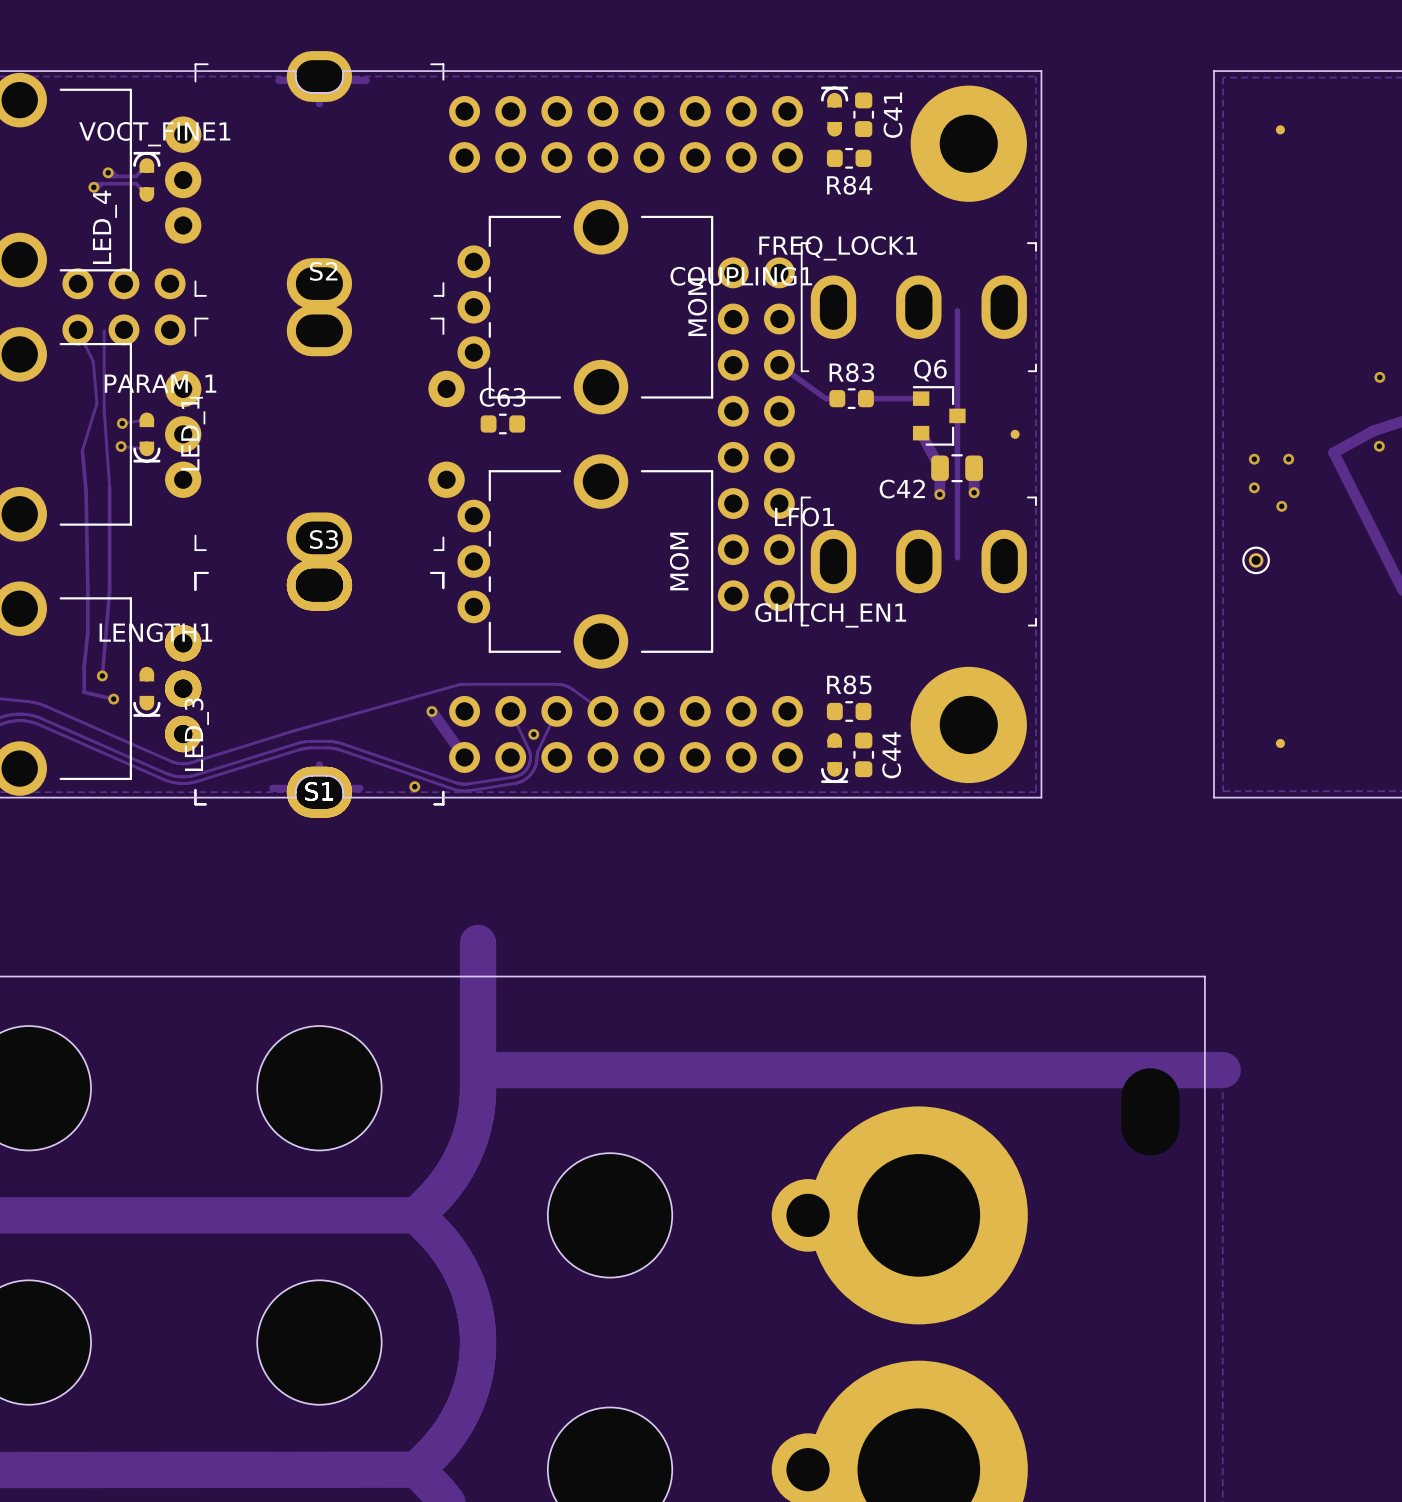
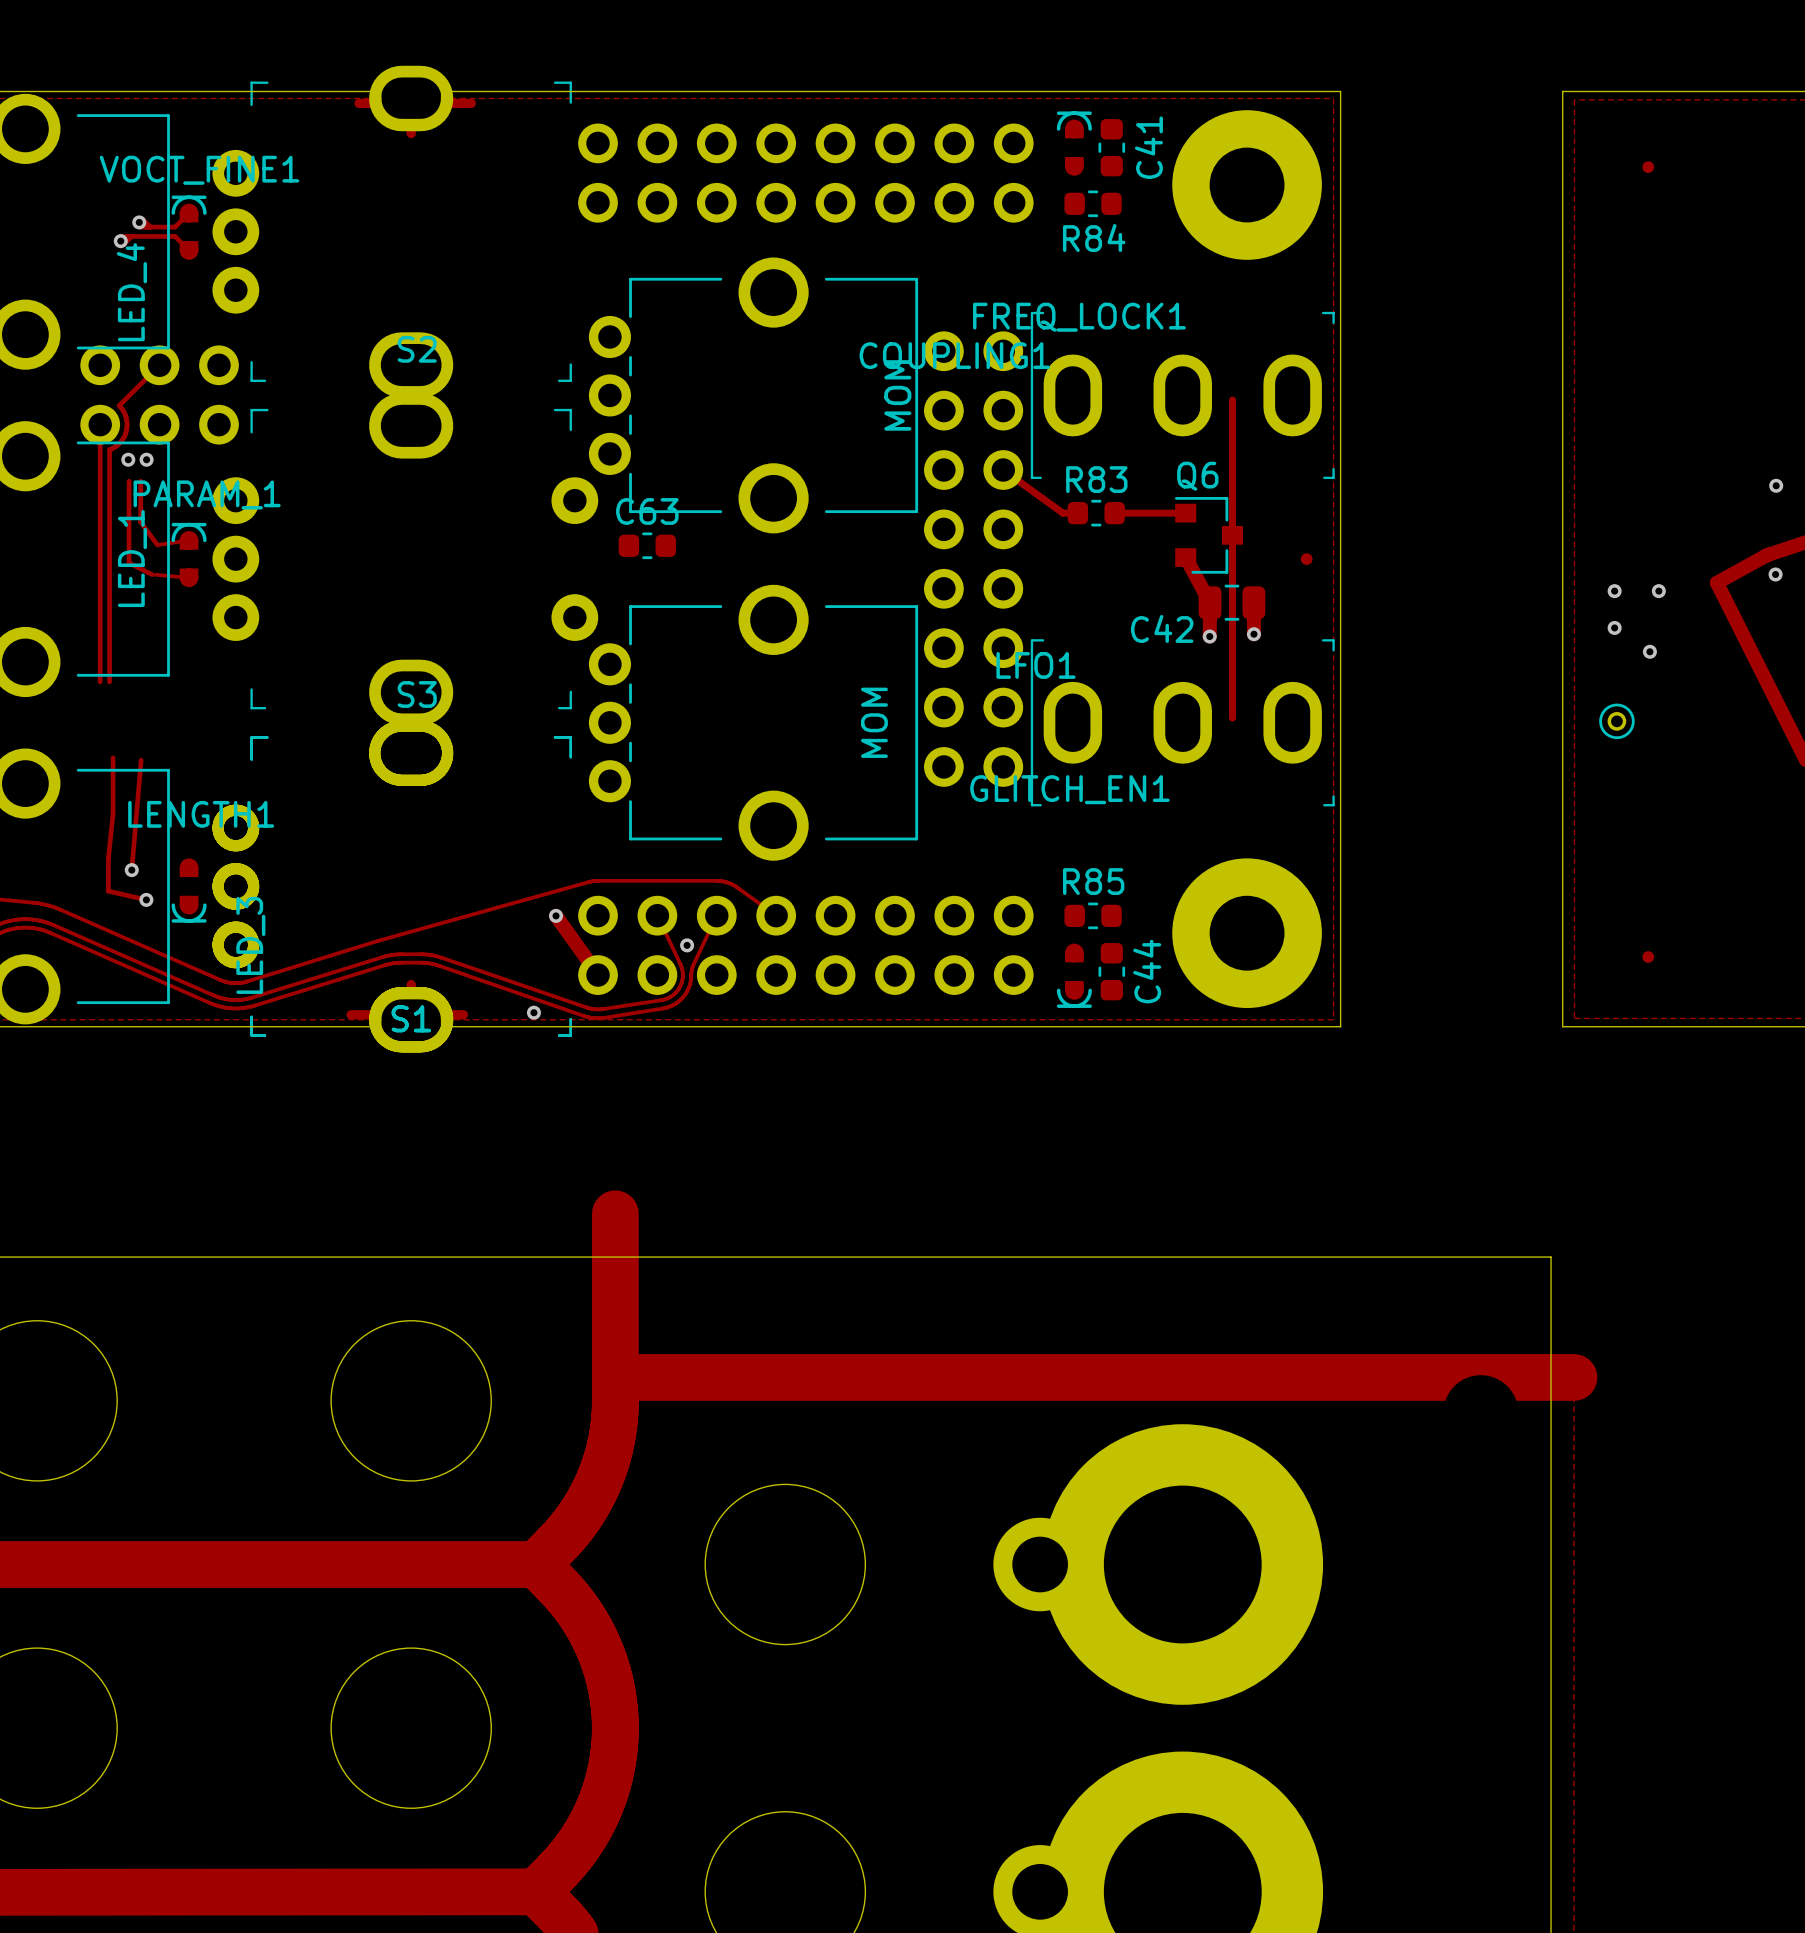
track: none -> (159, 365) (119, 405) (126, 417) (126, 430) (120, 442) (109, 449) (109, 681)
track: (77, 329) (93, 361) (96, 403) (82, 450) (86, 490) (87, 588) -> (100, 424) (100, 681)
track: (104, 330) (104, 410) (109, 487) (109, 590) -> none
via: none -> (128, 459)
via: none -> (146, 459)
track: none -> (129, 481) (129, 563) (152, 574)
track: none -> (140, 481) (140, 522) (157, 545)
via: (122, 423) -> none
LED_1 rotation: 0° (146, 437) -> 180° (189, 555)
via: (121, 446) -> none

